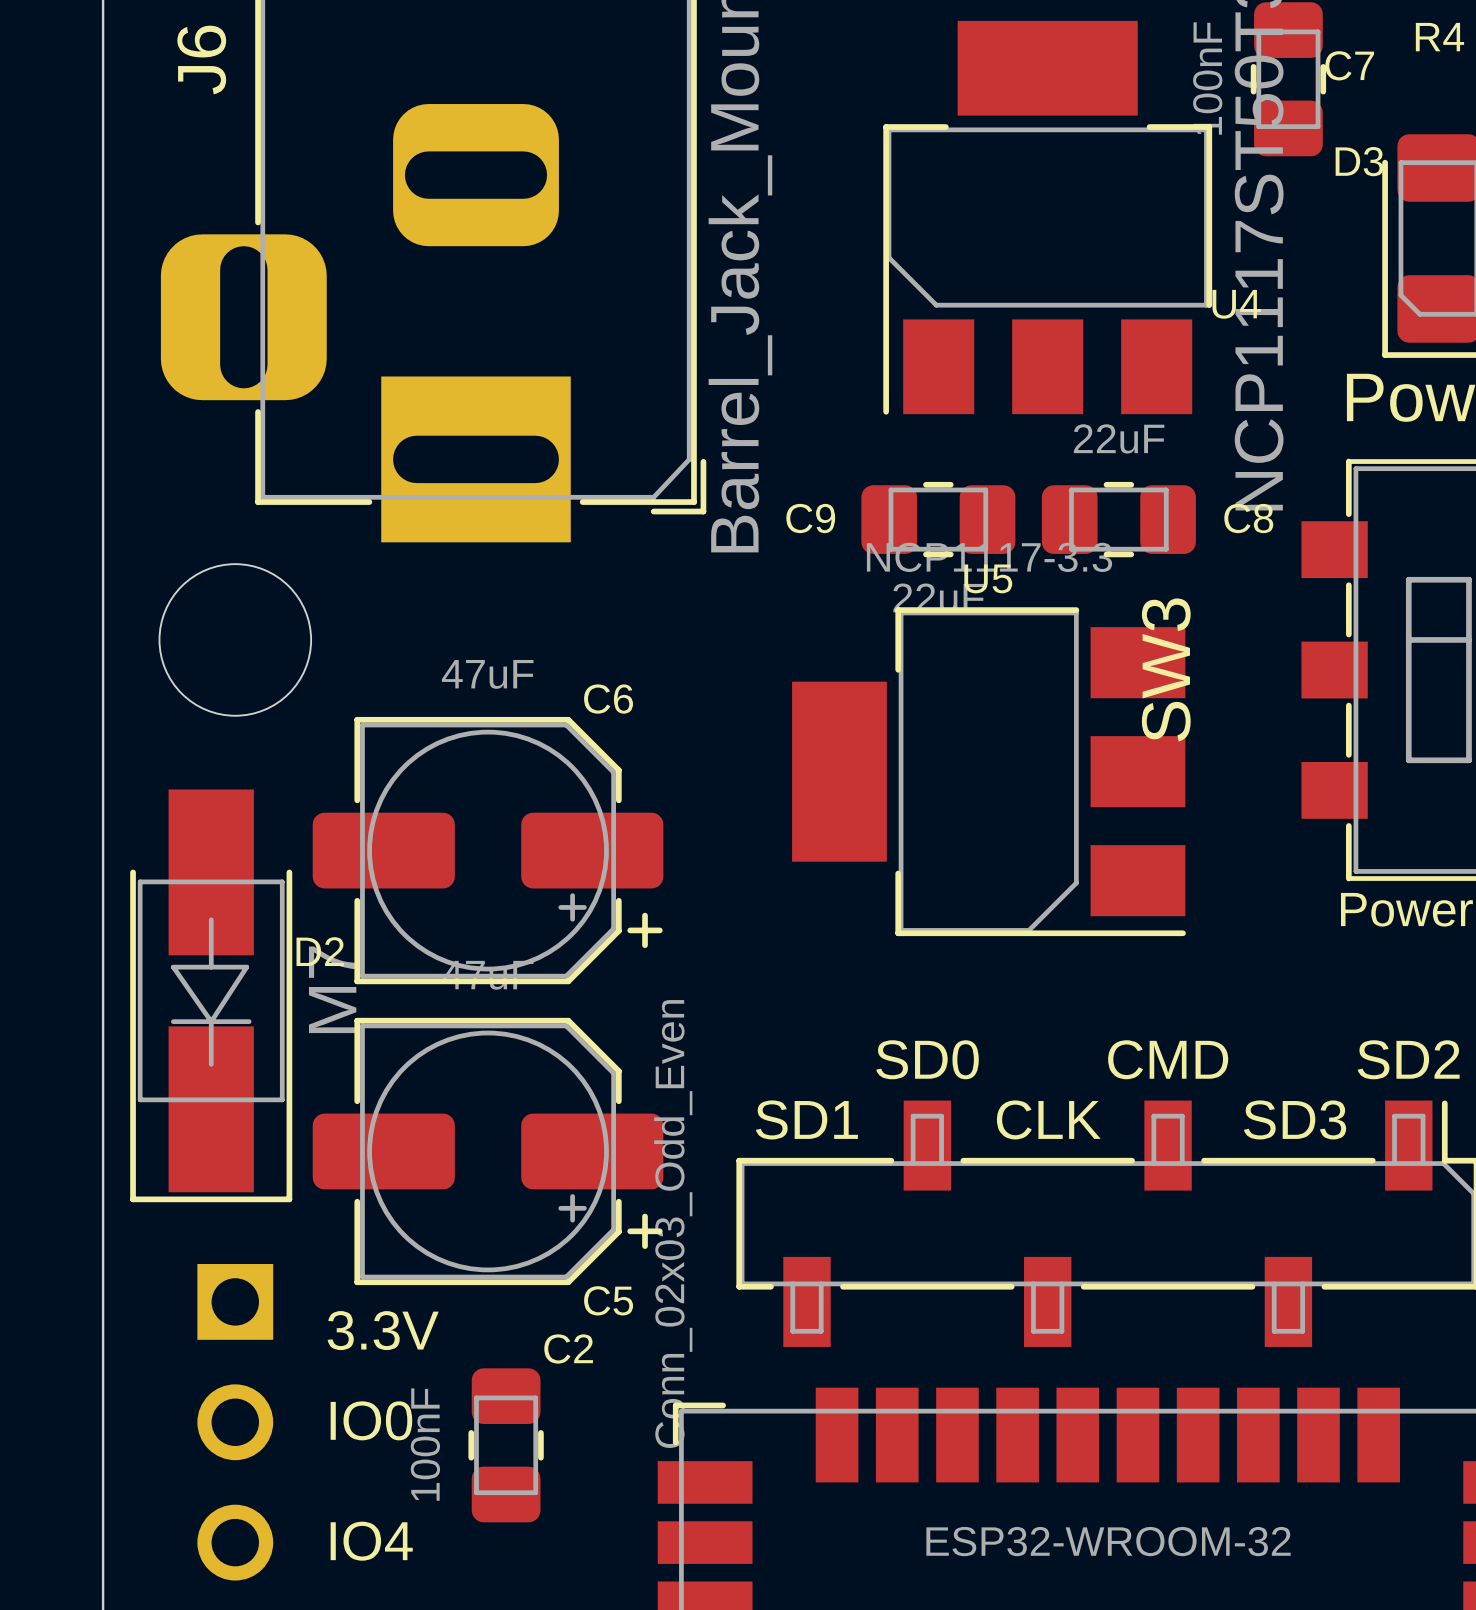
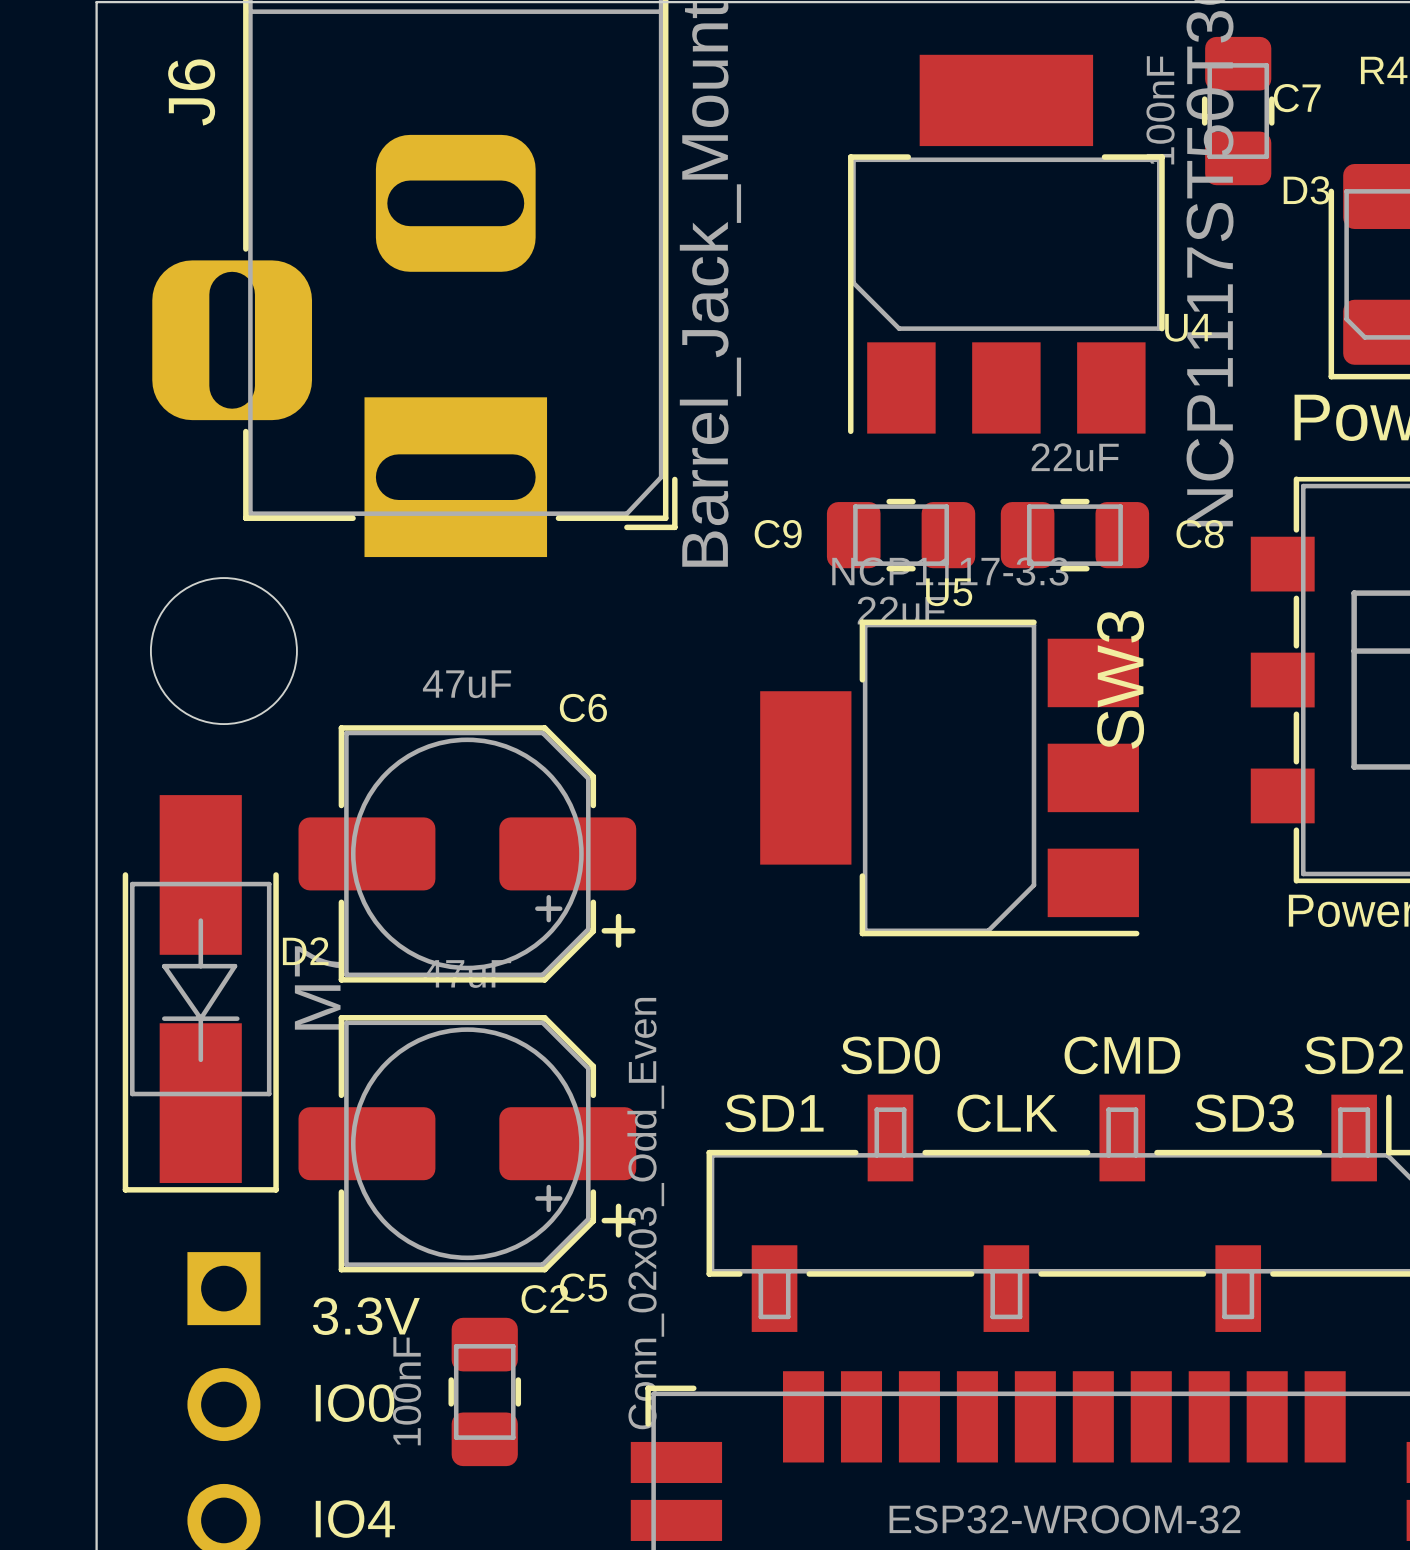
C2 position: (506, 1445) -> (484, 1391)

